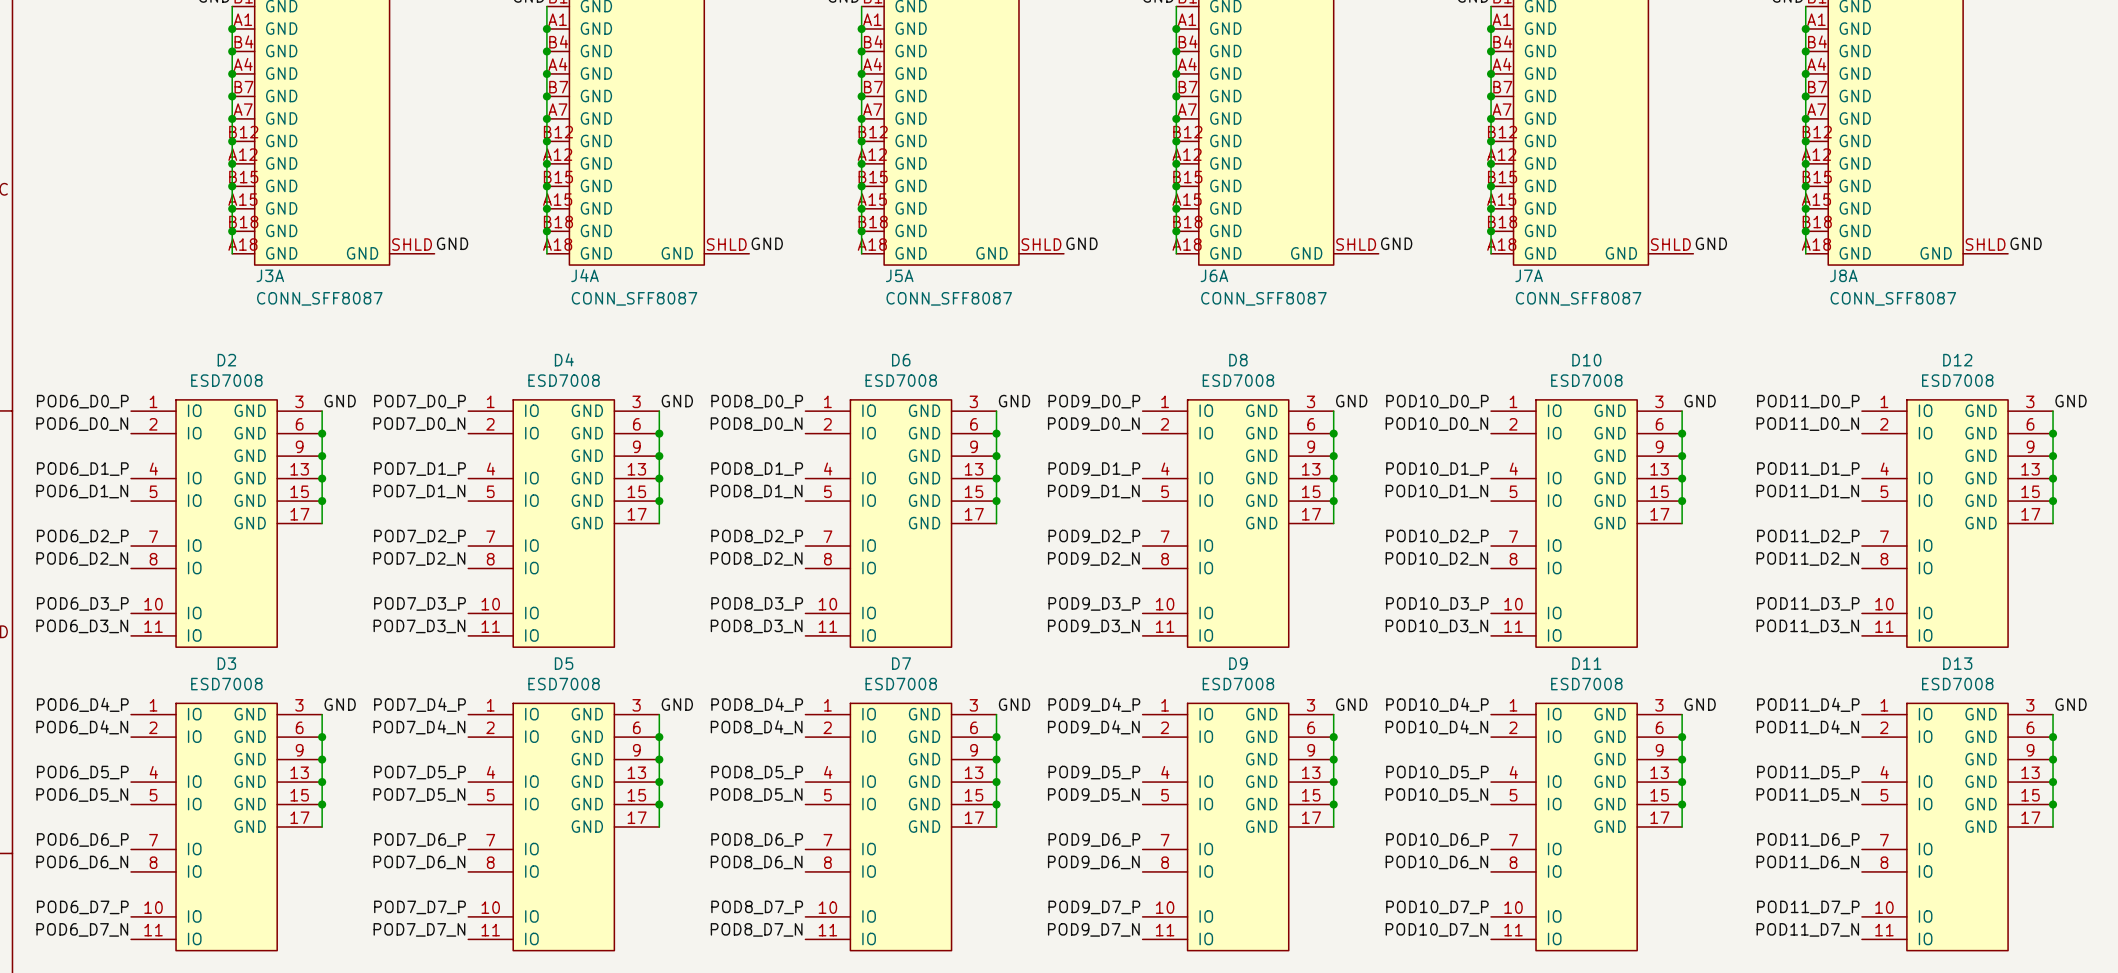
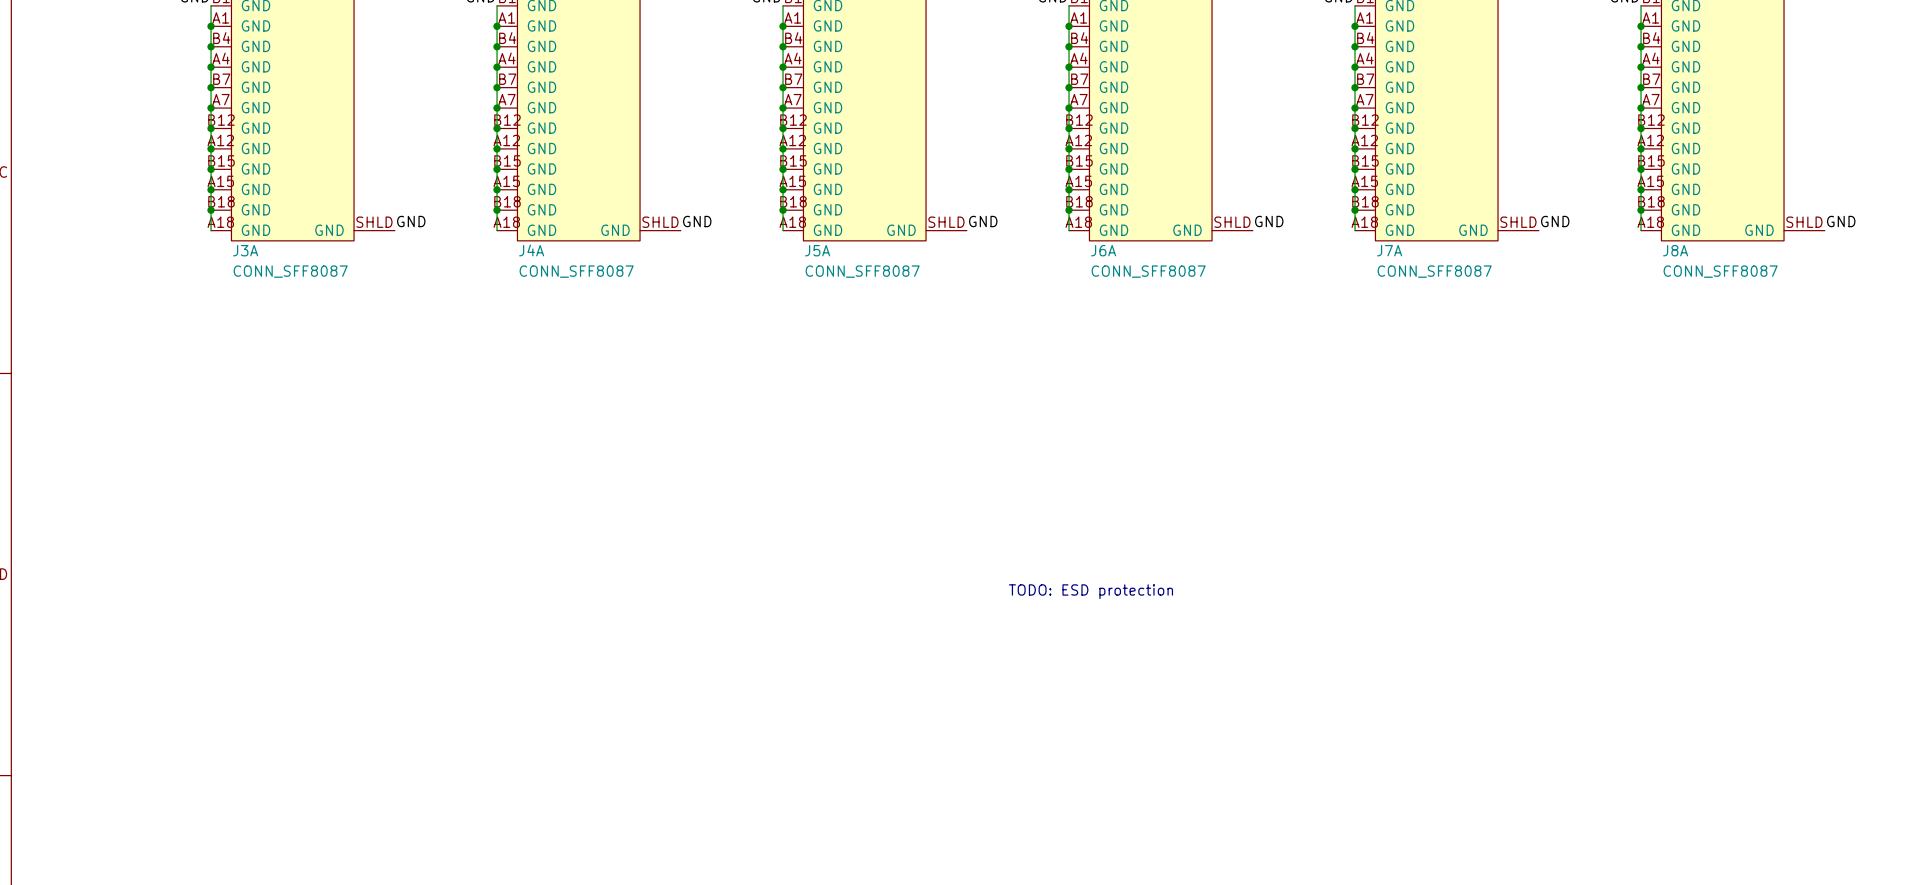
label: POD6_D0_P (82, 401) -> none
label: GND (340, 401) -> none
label: POD7_D0_P (419, 401) -> none
label: GND (677, 401) -> none
label: POD8_D0_P (757, 401) -> none
label: GND (1014, 401) -> none
label: POD9_D0_P (1094, 401) -> none
label: GND (1351, 401) -> none
label: POD10_D0_P (1437, 401) -> none
label: GND (1700, 401) -> none
label: POD11_D0_P (1808, 401) -> none
label: GND (2071, 401) -> none
wire: (322, 411) (322, 523) -> none
wire: (659, 411) (659, 523) -> none
wire: (996, 411) (996, 523) -> none
wire: (1333, 411) (1333, 523) -> none
wire: (1682, 411) (1682, 523) -> none
wire: (2053, 411) (2053, 523) -> none
label: POD6_D0_N (82, 424) -> none
label: POD7_D0_N (419, 424) -> none
label: POD8_D0_N (756, 424) -> none
label: POD9_D0_N (1093, 424) -> none
label: POD10_D0_N (1436, 424) -> none
label: POD11_D0_N (1807, 424) -> none
junction: (322, 433) -> none
junction: (659, 433) -> none
junction: (996, 433) -> none
junction: (1333, 433) -> none
junction: (1682, 433) -> none
junction: (2053, 433) -> none
junction: (322, 456) -> none
junction: (659, 456) -> none
junction: (996, 456) -> none
junction: (1333, 456) -> none
junction: (1682, 456) -> none
junction: (2053, 456) -> none
label: POD6_D1_P (82, 469) -> none
label: POD7_D1_P (419, 469) -> none
label: POD8_D1_P (757, 469) -> none
label: POD9_D1_P (1094, 469) -> none
label: POD10_D1_P (1437, 469) -> none
label: POD11_D1_P (1808, 469) -> none
junction: (322, 478) -> none
junction: (659, 478) -> none
junction: (996, 478) -> none
junction: (1333, 478) -> none
junction: (1682, 478) -> none
junction: (2053, 478) -> none
label: POD6_D1_N (82, 491) -> none
label: POD7_D1_N (419, 491) -> none
label: POD8_D1_N (756, 491) -> none
label: POD9_D1_N (1093, 491) -> none
label: POD10_D1_N (1436, 491) -> none
label: POD11_D1_N (1807, 491) -> none
junction: (322, 501) -> none
junction: (659, 501) -> none
junction: (996, 501) -> none
junction: (1333, 501) -> none
junction: (1682, 501) -> none
junction: (2053, 501) -> none
D2: ESD7008 (226, 523) -> none
D4: ESD7008 (563, 523) -> none
D6: ESD7008 (900, 523) -> none
D8: ESD7008 (1238, 523) -> none
D10: ESD7008 (1586, 523) -> none
D12: ESD7008 (1957, 523) -> none
label: POD6_D2_P (82, 536) -> none
label: POD7_D2_P (419, 536) -> none
label: POD8_D2_P (757, 536) -> none
label: POD9_D2_P (1094, 536) -> none
label: POD10_D2_P (1437, 536) -> none
label: POD11_D2_P (1808, 536) -> none
label: POD6_D2_N (82, 558) -> none
label: POD7_D2_N (419, 558) -> none
label: POD8_D2_N (756, 558) -> none
label: POD9_D2_N (1093, 558) -> none
label: POD10_D2_N (1436, 558) -> none
label: POD11_D2_N (1807, 558) -> none
label: POD6_D3_P (82, 603) -> none
label: POD7_D3_P (419, 603) -> none
label: POD8_D3_P (757, 603) -> none
label: POD9_D3_P (1094, 603) -> none
label: POD10_D3_P (1437, 603) -> none
label: POD11_D3_P (1808, 603) -> none
label: POD6_D3_N (82, 626) -> none
label: POD7_D3_N (419, 626) -> none
label: POD8_D3_N (756, 626) -> none
label: POD9_D3_N (1093, 626) -> none
label: POD10_D3_N (1436, 626) -> none
label: POD11_D3_N (1807, 626) -> none
text: none -> TODO: ESD protection (1090, 591)
label: POD6_D4_P (82, 704) -> none
label: GND (340, 704) -> none
label: POD7_D4_P (419, 704) -> none
label: GND (677, 704) -> none
label: POD8_D4_P (757, 704) -> none
label: GND (1014, 704) -> none
label: POD9_D4_P (1094, 704) -> none
label: GND (1351, 704) -> none
label: POD10_D4_P (1437, 704) -> none
label: GND (1700, 704) -> none
label: POD11_D4_P (1808, 704) -> none
label: GND (2071, 704) -> none
wire: (322, 714) (322, 827) -> none
wire: (659, 714) (659, 827) -> none
wire: (996, 714) (996, 827) -> none
wire: (1333, 714) (1333, 827) -> none
wire: (1682, 714) (1682, 827) -> none
wire: (2053, 714) (2053, 827) -> none
label: POD6_D4_N (82, 727) -> none
label: POD7_D4_N (419, 727) -> none
label: POD8_D4_N (756, 727) -> none
label: POD9_D4_N (1093, 727) -> none
label: POD10_D4_N (1436, 727) -> none
label: POD11_D4_N (1807, 727) -> none
junction: (322, 737) -> none
junction: (659, 737) -> none
junction: (996, 737) -> none
junction: (1333, 737) -> none
junction: (1682, 737) -> none
junction: (2053, 737) -> none
junction: (322, 759) -> none
junction: (659, 759) -> none
junction: (996, 759) -> none
junction: (1333, 759) -> none
junction: (1682, 759) -> none
junction: (2053, 759) -> none
label: POD6_D5_P (82, 772) -> none
label: POD7_D5_P (419, 772) -> none
label: POD8_D5_P (757, 772) -> none
label: POD9_D5_P (1094, 772) -> none
label: POD10_D5_P (1437, 772) -> none
label: POD11_D5_P (1808, 772) -> none
junction: (322, 782) -> none
junction: (659, 782) -> none
junction: (996, 782) -> none
junction: (1333, 782) -> none
junction: (1682, 782) -> none
junction: (2053, 782) -> none
label: POD6_D5_N (82, 795) -> none
label: POD7_D5_N (419, 795) -> none
label: POD8_D5_N (756, 795) -> none
label: POD9_D5_N (1093, 795) -> none
label: POD10_D5_N (1436, 795) -> none
label: POD11_D5_N (1807, 795) -> none
junction: (322, 804) -> none
junction: (659, 804) -> none
junction: (996, 804) -> none
junction: (1333, 804) -> none
junction: (1682, 804) -> none
junction: (2053, 804) -> none
D3: ESD7008 (226, 827) -> none
D5: ESD7008 (563, 827) -> none
D7: ESD7008 (900, 827) -> none
D9: ESD7008 (1238, 827) -> none
D11: ESD7008 (1586, 827) -> none
D13: ESD7008 (1957, 827) -> none
label: POD6_D6_P (82, 839) -> none
label: POD7_D6_P (419, 839) -> none
label: POD8_D6_P (757, 839) -> none
label: POD9_D6_P (1094, 839) -> none
label: POD10_D6_P (1437, 839) -> none
label: POD11_D6_P (1808, 839) -> none
label: POD6_D6_N (82, 862) -> none
label: POD7_D6_N (419, 862) -> none
label: POD8_D6_N (756, 862) -> none
label: POD9_D6_N (1093, 862) -> none
label: POD10_D6_N (1436, 862) -> none
label: POD11_D6_N (1807, 862) -> none
label: POD6_D7_P (82, 907) -> none
label: POD7_D7_P (419, 907) -> none
label: POD8_D7_P (757, 907) -> none
label: POD9_D7_P (1094, 907) -> none
label: POD10_D7_P (1437, 907) -> none
label: POD11_D7_P (1808, 907) -> none
label: POD6_D7_N (82, 929) -> none
label: POD7_D7_N (419, 929) -> none
label: POD8_D7_N (756, 929) -> none
label: POD9_D7_N (1093, 929) -> none
label: POD10_D7_N (1436, 929) -> none
label: POD11_D7_N (1807, 929) -> none

